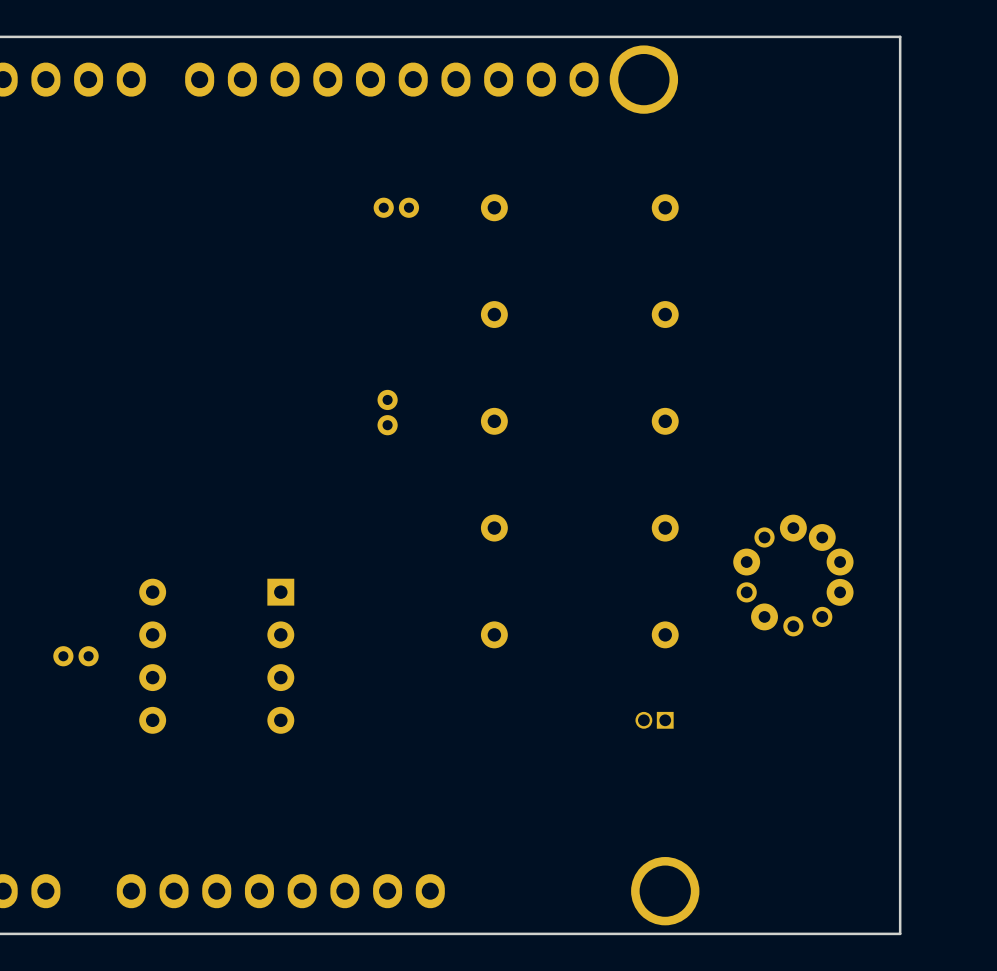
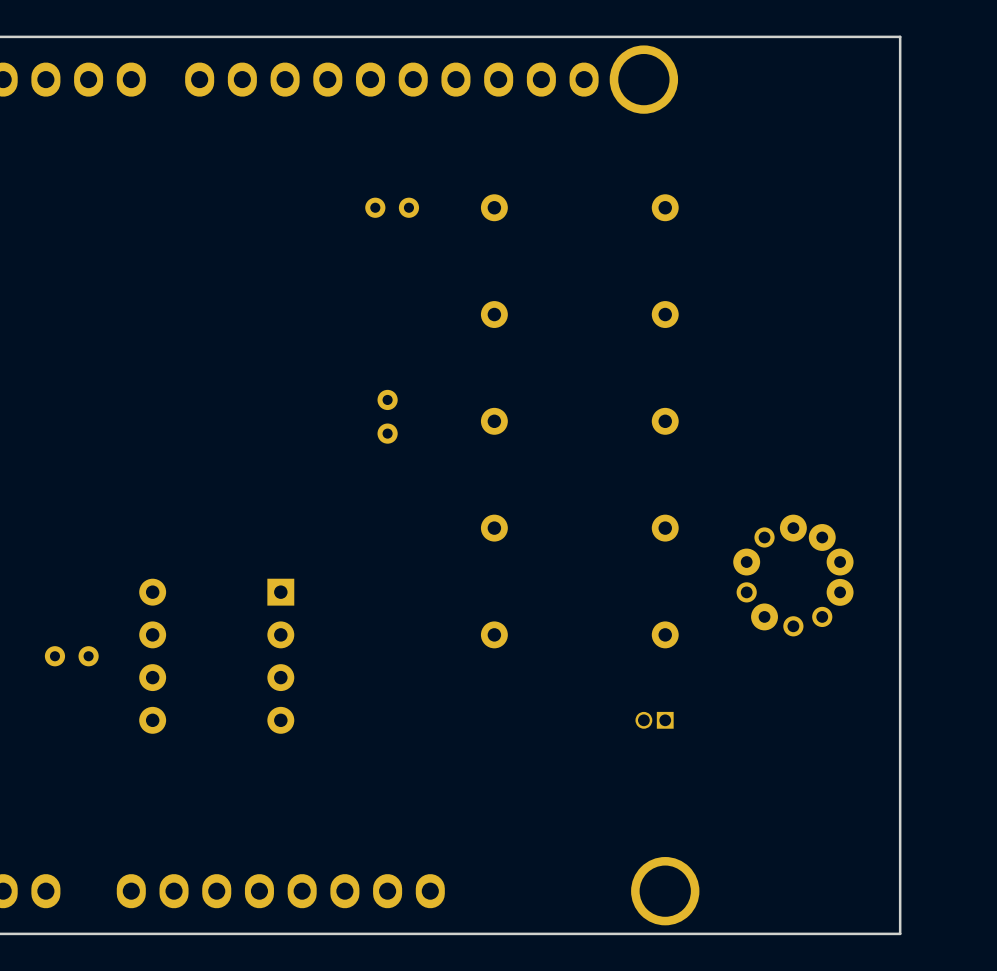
part footprint: [373, 197, 420, 218] -> [365, 197, 420, 218]
part footprint: [377, 389, 398, 436] -> [377, 389, 398, 444]
part footprint: [53, 646, 99, 667] -> [44, 646, 99, 667]

